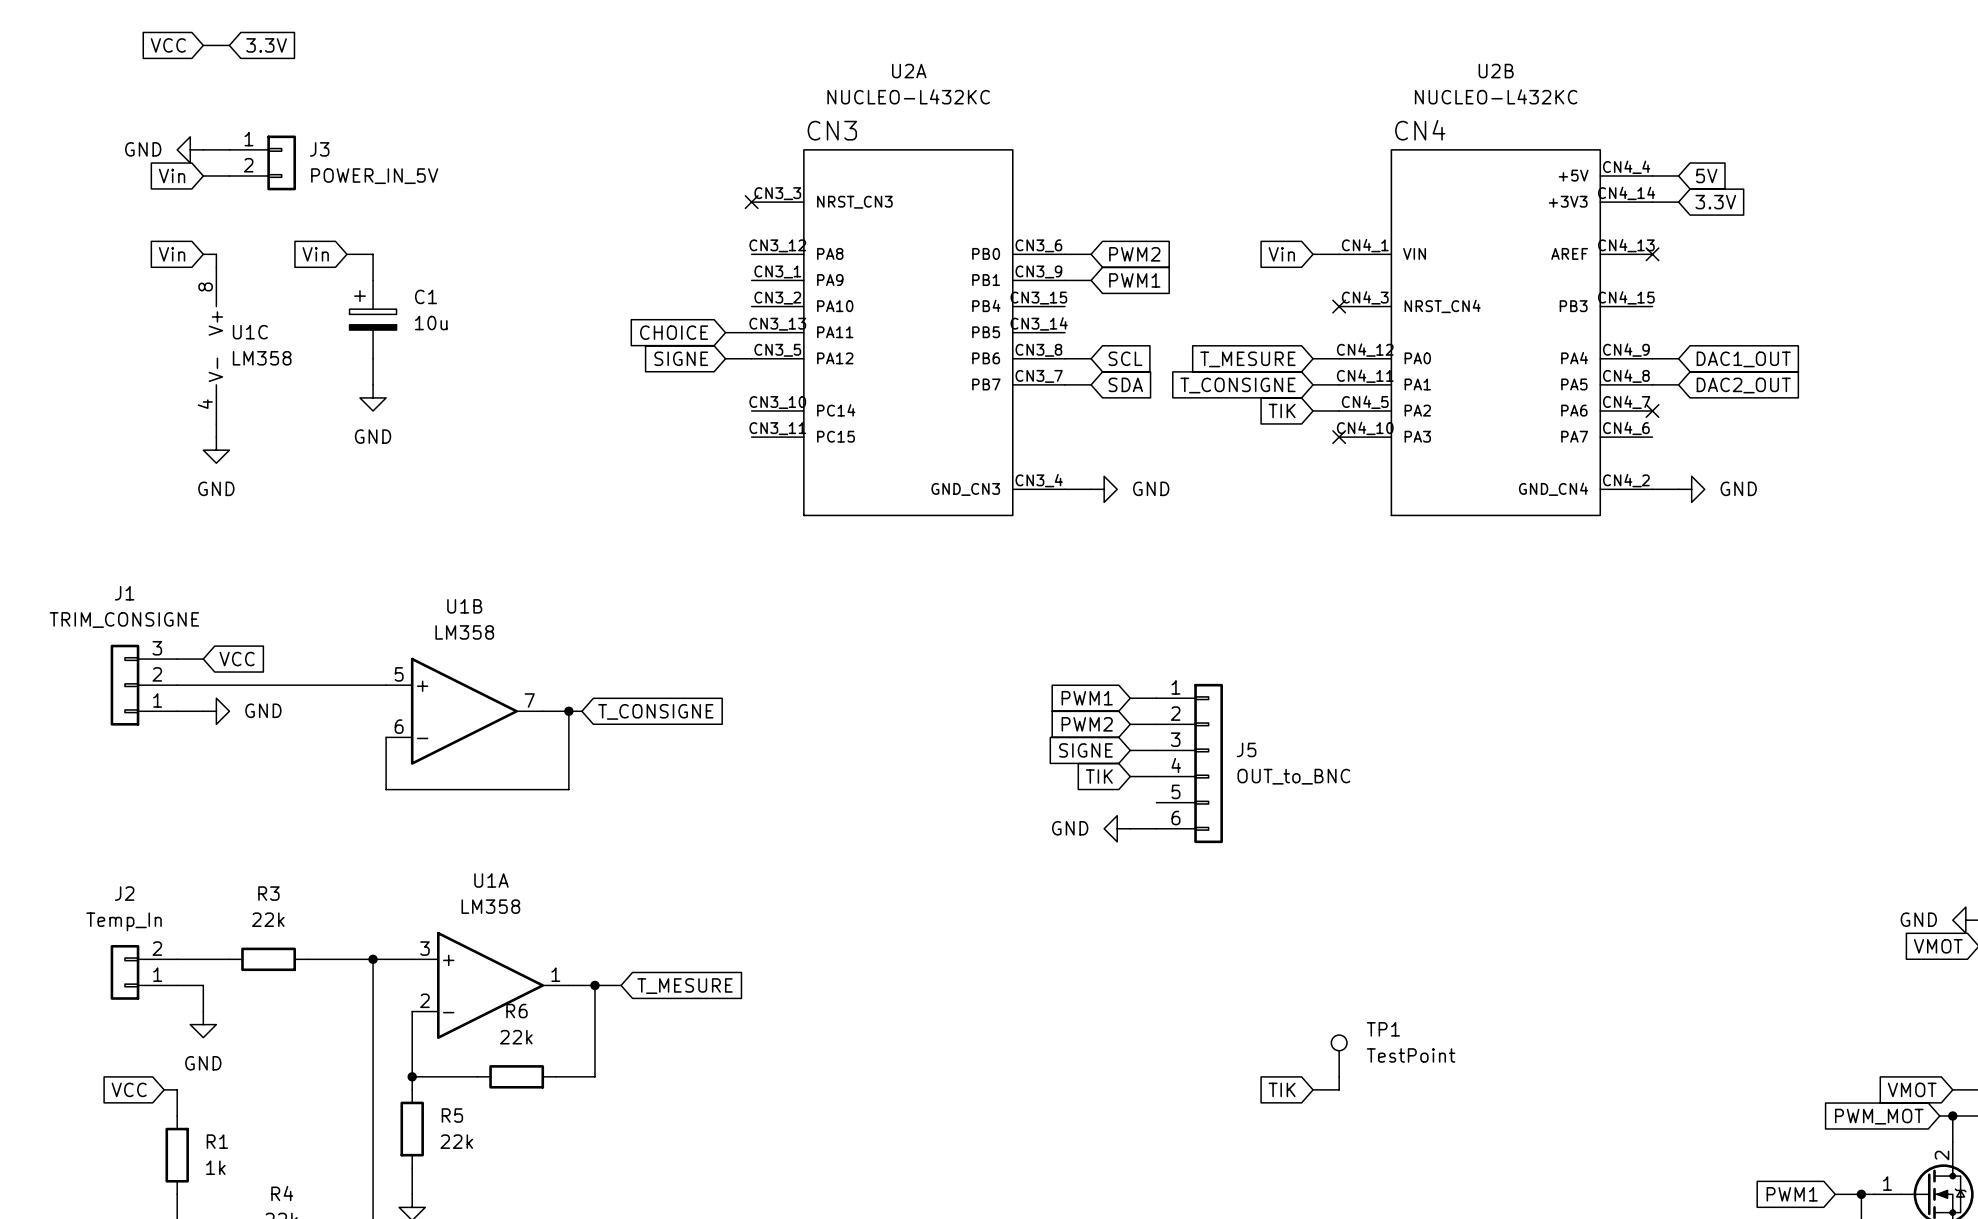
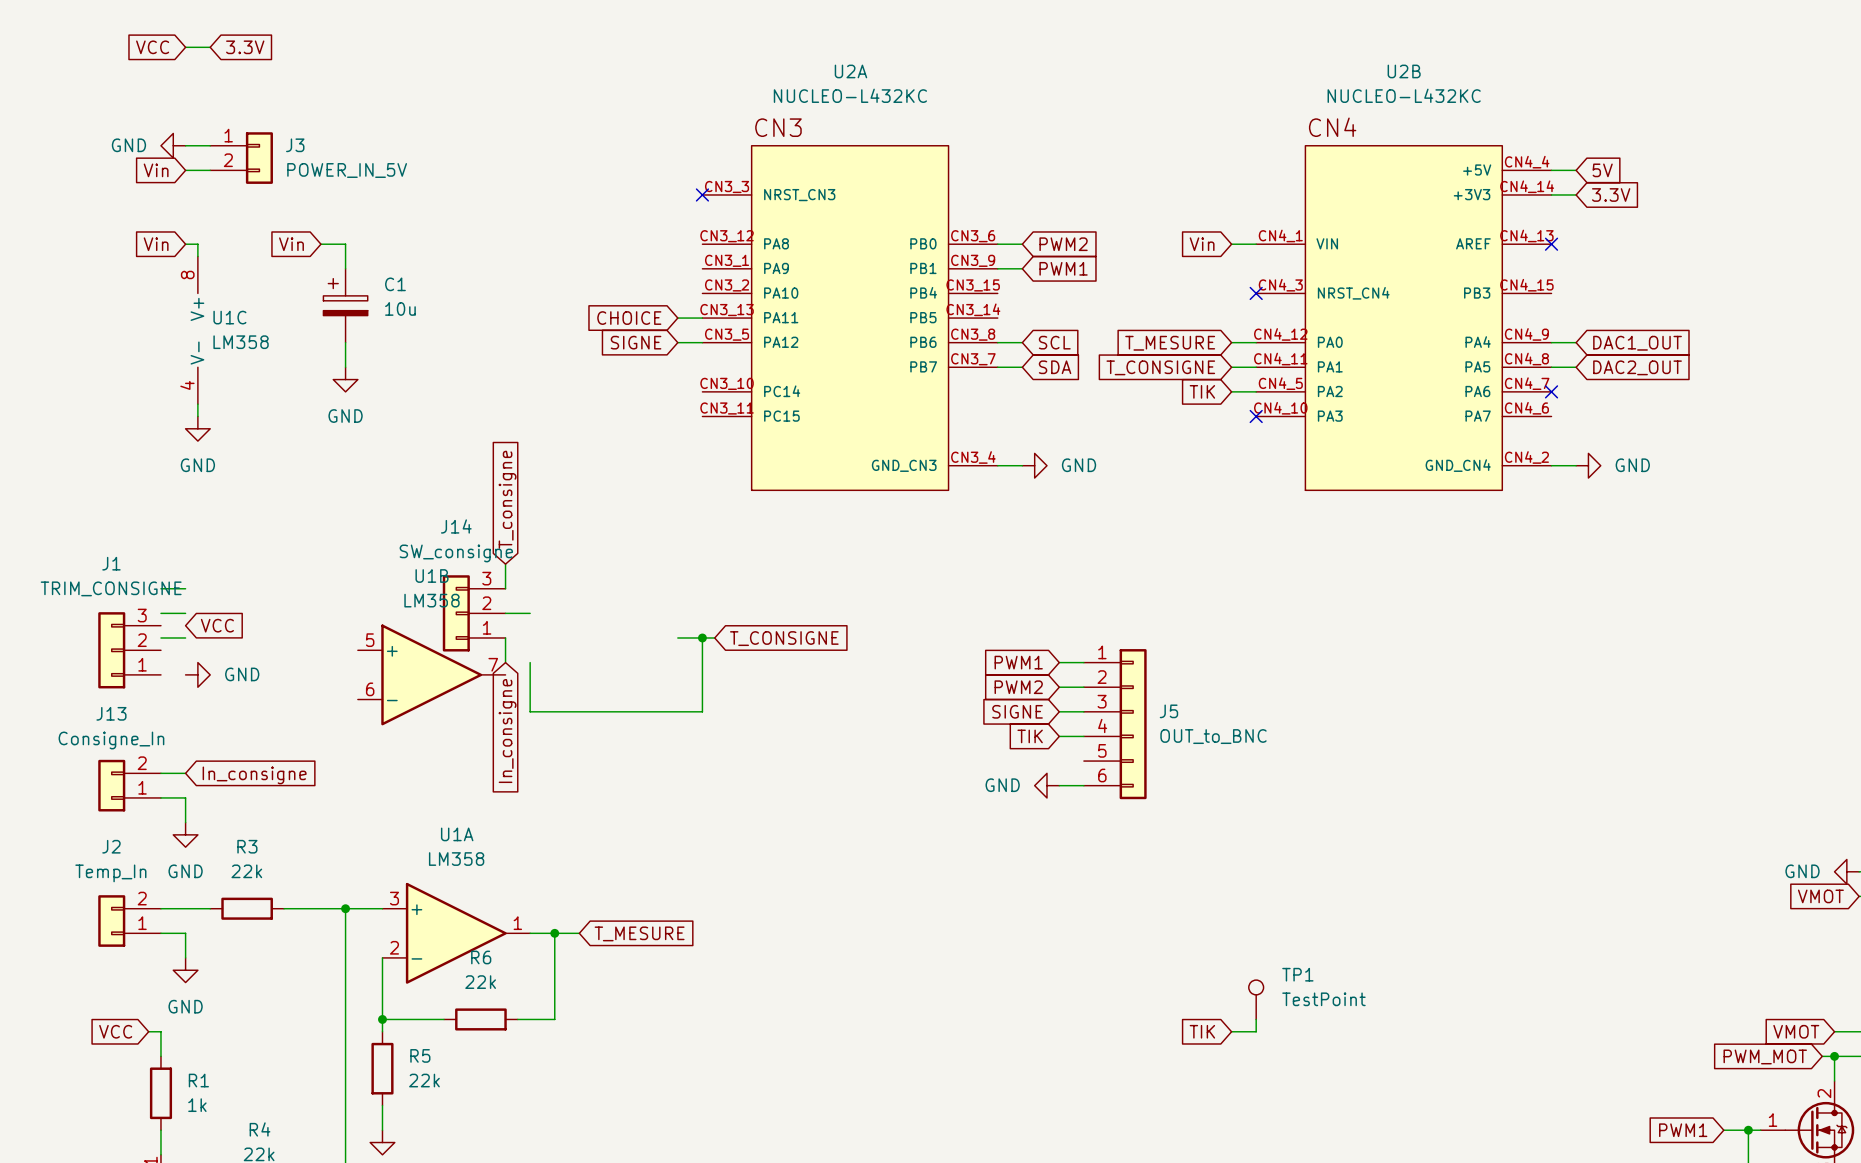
global label: none -> T_consigne (507, 499)
wire: none -> (505, 564) (505, 588)
wire: none -> (160, 613) (185, 613)
J14: none -> SW_consigne (474, 613)
wire: none -> (505, 613) (530, 613)
wire: (177, 659) (203, 659) -> (160, 588) (185, 588)
wire: none -> (505, 637) (505, 662)
junction: none -> (702, 637)
wire: (177, 685) (386, 685) -> none
wire: none -> (530, 662) (530, 674)
wire: (177, 711) (203, 711) -> (160, 637) (185, 637)
wire: (542, 711) (581, 711) -> (677, 637) (714, 637)
junction: (568, 711) -> none
global label position: T_CONSIGNE (655, 711) -> T_CONSIGNE (784, 638)
wire: (386, 737) (386, 789) (568, 789) (568, 750) -> (702, 637) (702, 711) (530, 711)
global label: none -> In_consigne (507, 731)
wire: none -> (160, 773) (185, 773)
global label: none -> In_consigne (254, 775)
J13: none -> Consigne_In (129, 785)
wire: none -> (160, 797) (185, 797) (185, 822)
power symbol: none -> GND (185, 834)

